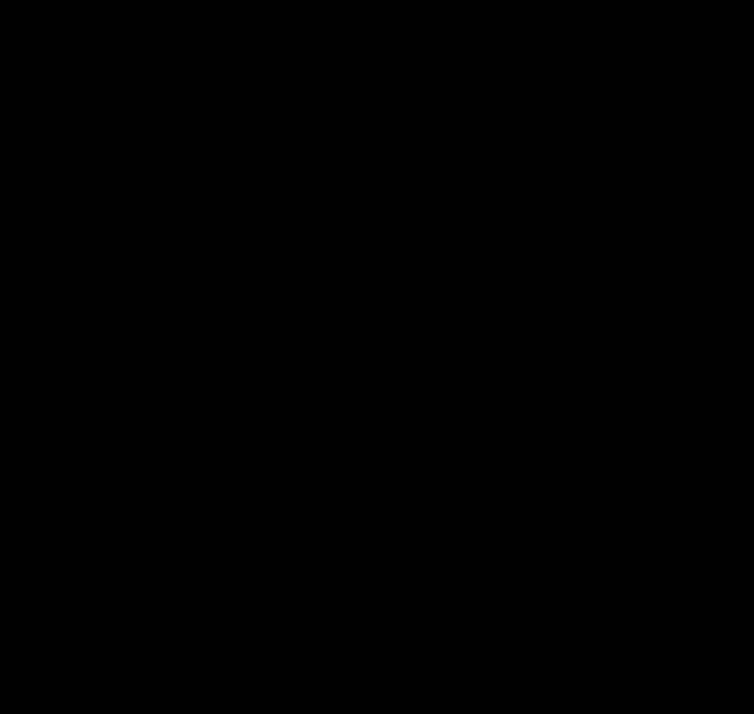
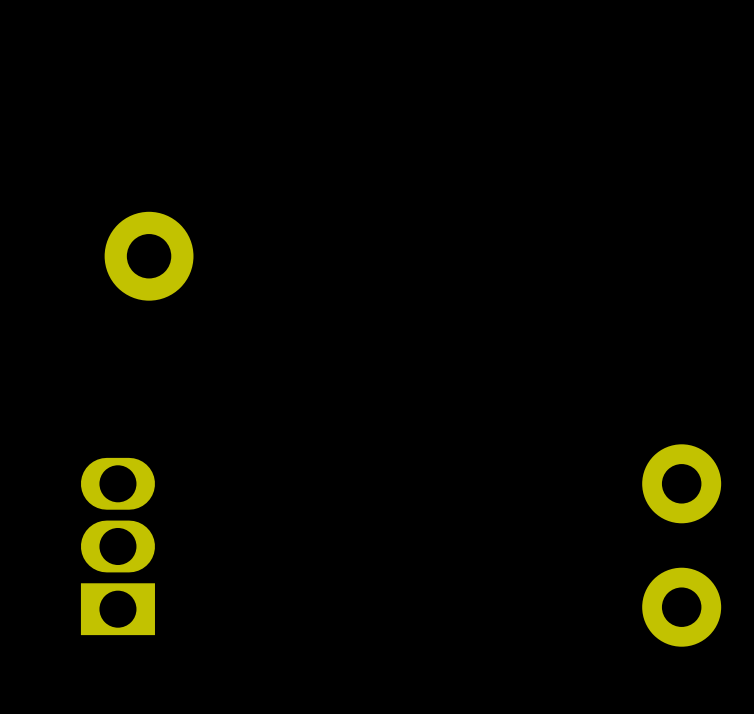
part: none -> (149, 256)
part: none -> (681, 545)
part: none -> (117, 546)

